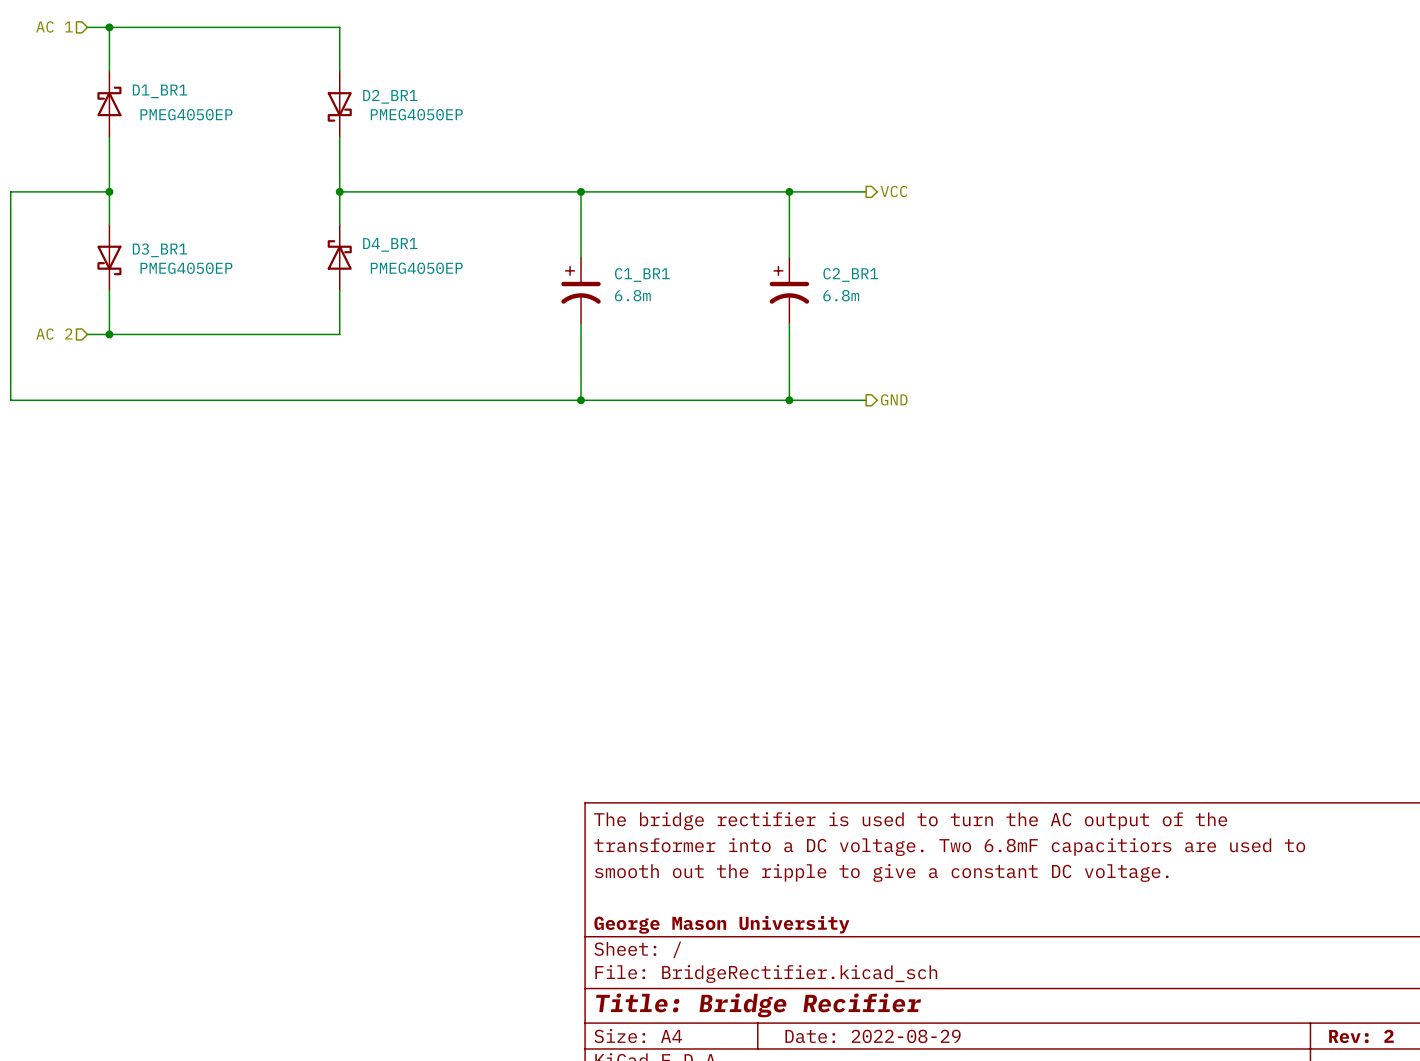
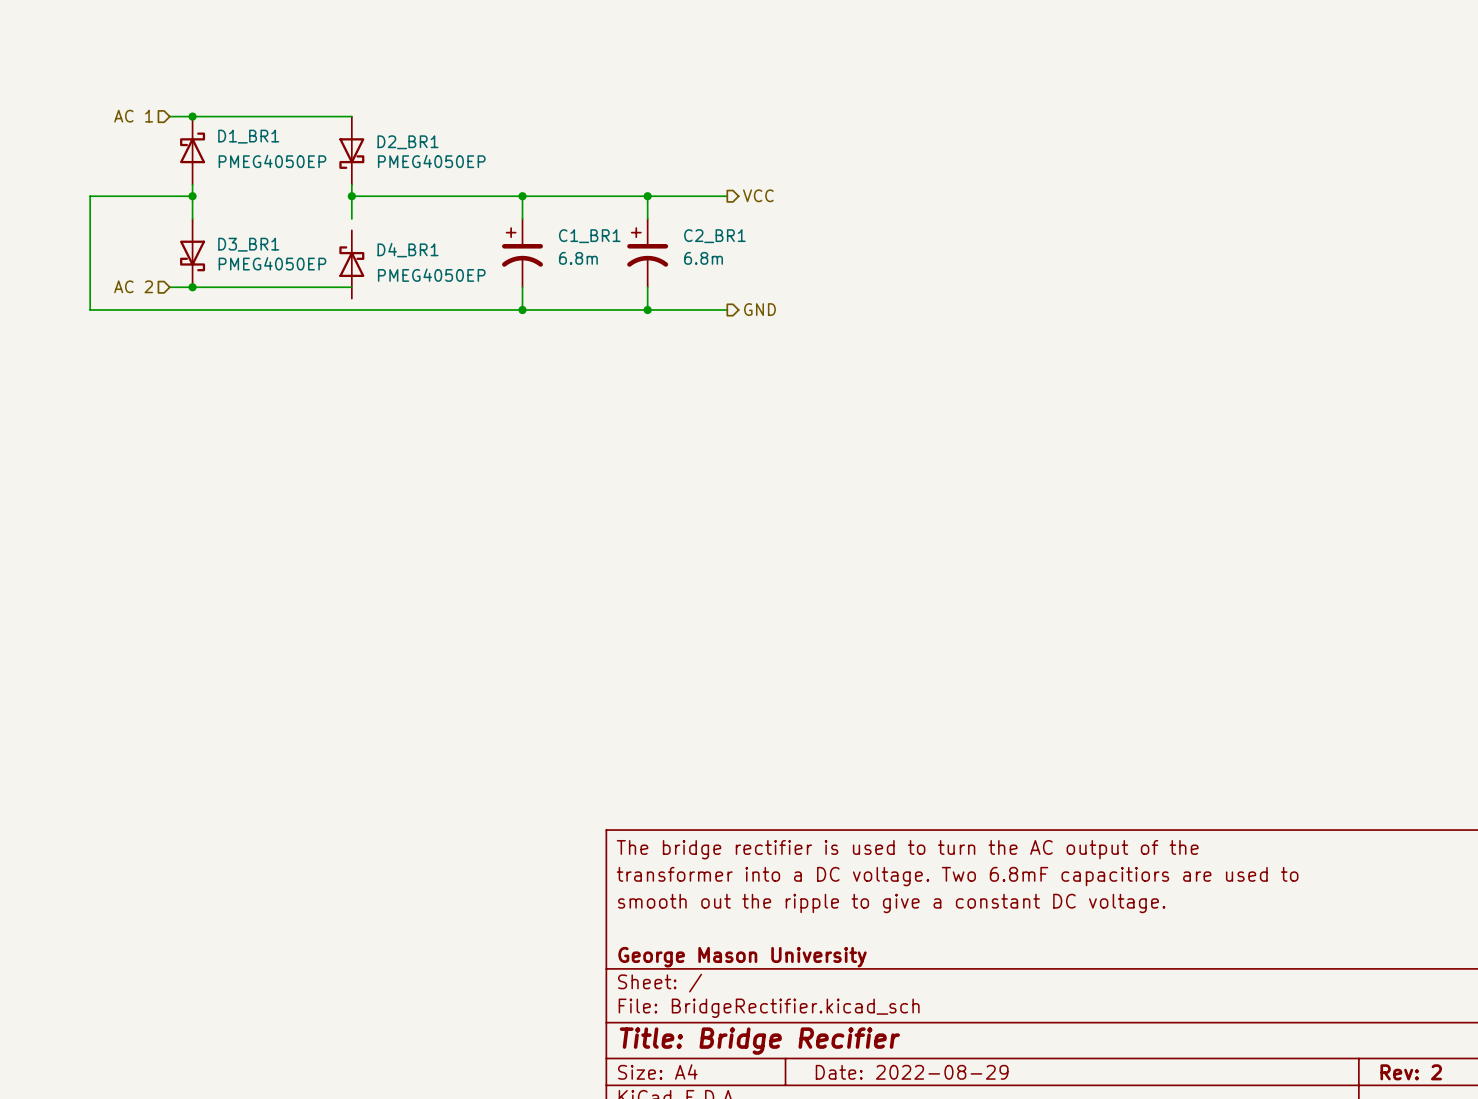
hierarchical label position: AC 1 (54, 26) -> AC 1 (133, 116)
wire: (87, 27) (339, 27) (339, 71) -> none
wire: (109, 27) (109, 71) -> none
junction: (109, 27) -> none
D1_BR1 position: (109, 104) -> (192, 150)
D2_BR1 position: (339, 104) -> (351, 150)
wire: none -> (169, 116) (351, 116)
junction: none -> (192, 116)
wire: (109, 137) (109, 224) -> none
wire: none -> (192, 184) (192, 218)
wire: (87, 191) (10, 191) (10, 400) (866, 400) -> (90, 196) (90, 310) (727, 310)
wire: none -> (112, 196) (192, 196)
junction: (109, 191) -> none
junction: none -> (192, 196)
wire: none -> (522, 196) (522, 218)
junction: none -> (522, 196)
wire: (581, 191) (581, 257) -> none
junction: (581, 191) -> none
wire: none -> (647, 196) (647, 218)
junction: none -> (647, 196)
wire: (701, 191) (866, 191) -> none
wire: (789, 191) (789, 257) -> none
junction: (789, 191) -> none
hierarchical label position: VCC (894, 191) -> VCC (758, 195)
wire: (339, 213) (339, 224) -> none
D3_BR1 position: (109, 257) -> (192, 253)
wire: none -> (169, 287) (351, 287)
junction: none -> (192, 287)
wire: none -> (522, 287) (522, 310)
wire: none -> (647, 287) (647, 310)
wire: (109, 290) (109, 334) -> none
wire: (339, 290) (339, 334) (87, 334) -> none
C1_BR1 position: (581, 290) -> (522, 253)
C2_BR1 position: (789, 290) -> (647, 253)
junction: none -> (522, 310)
junction: none -> (647, 310)
wire: (581, 323) (581, 400) -> none
wire: (789, 323) (789, 400) -> none
hierarchical label position: AC 2 (54, 334) -> AC 2 (133, 286)
junction: (109, 334) -> none
hierarchical label position: GND (894, 399) -> GND (759, 309)
junction: (581, 400) -> none
junction: (789, 400) -> none

